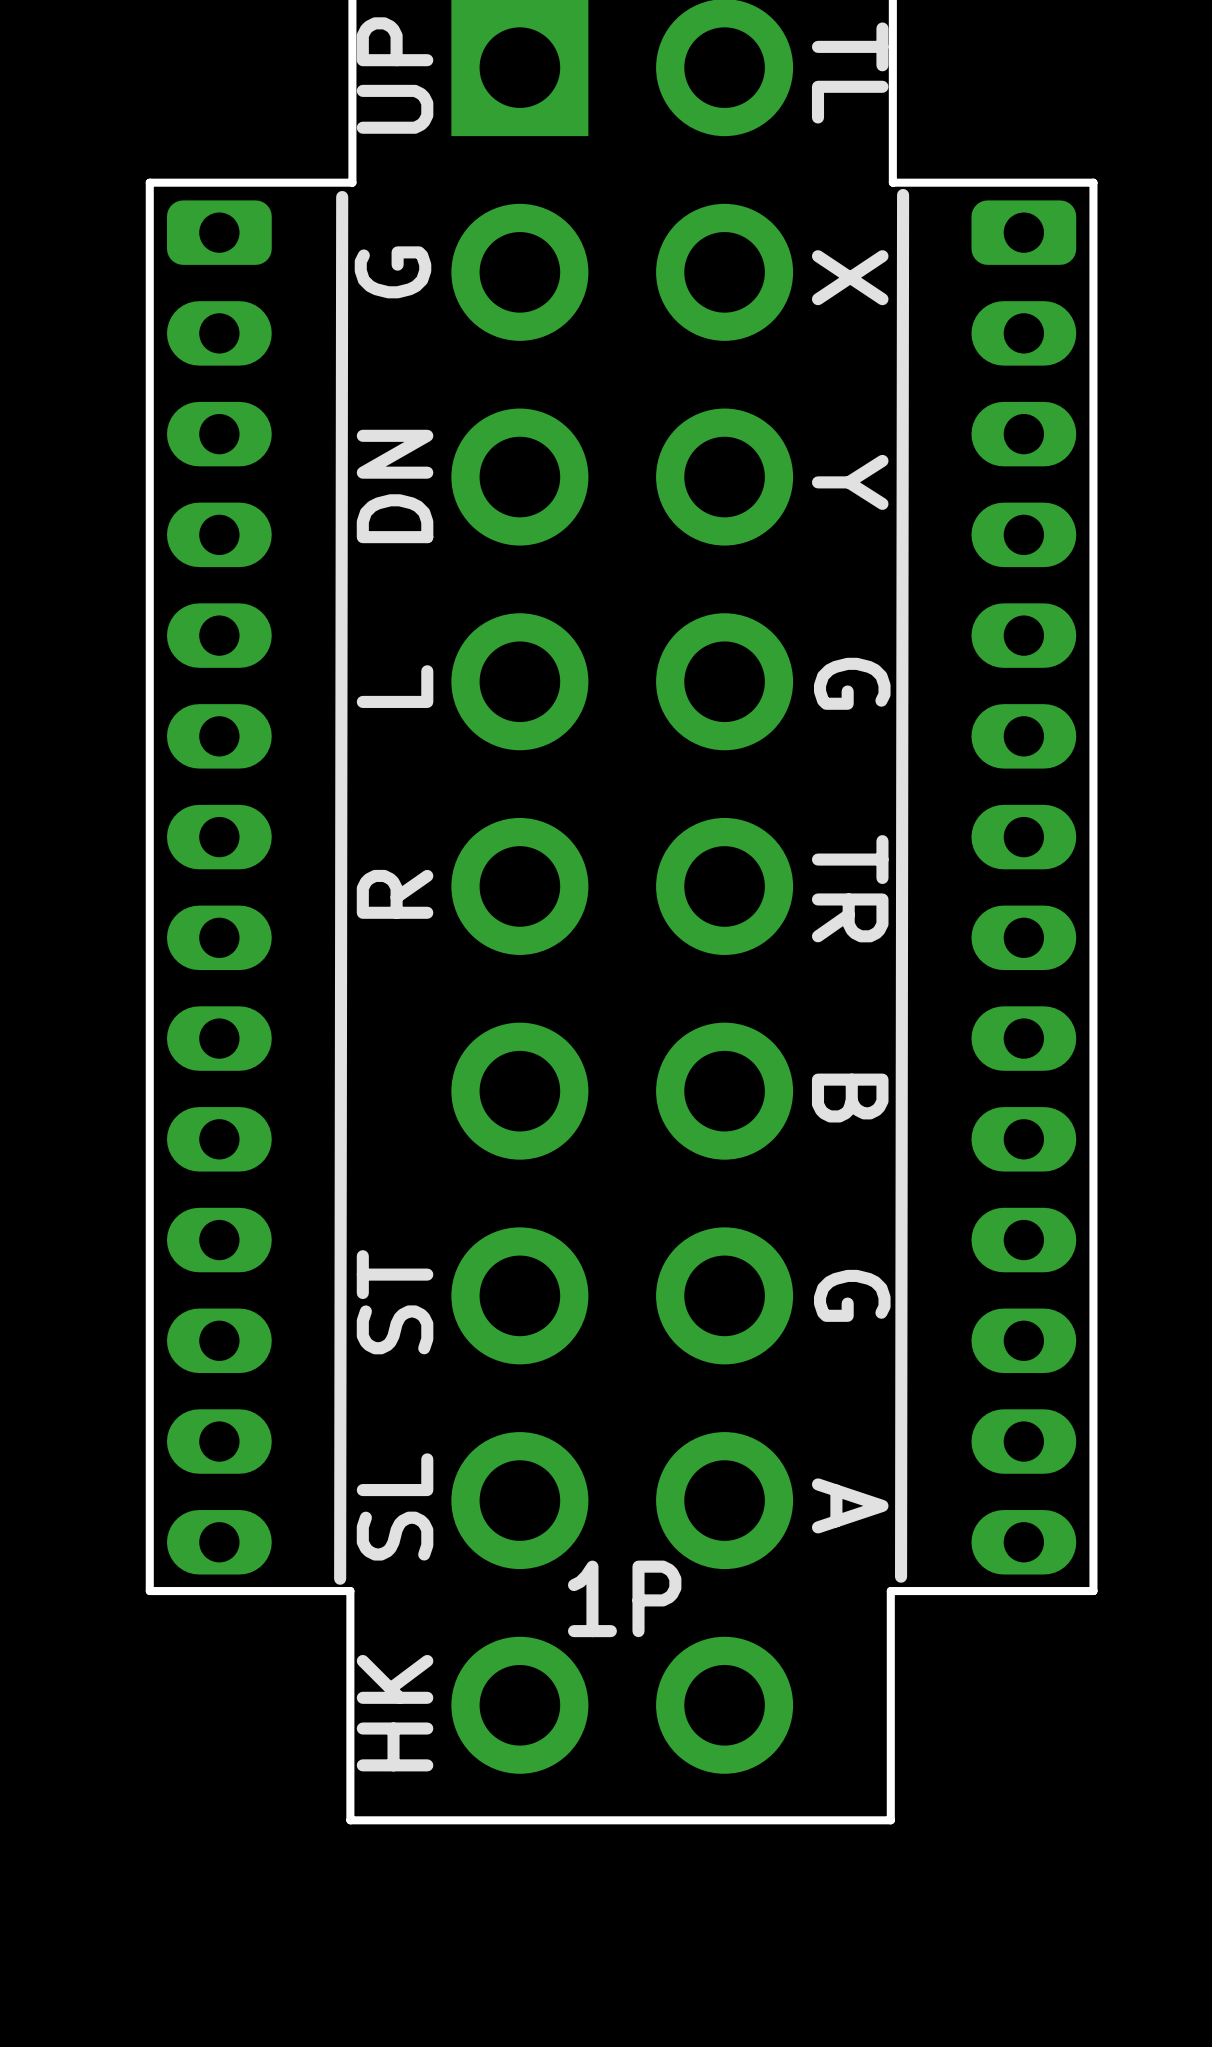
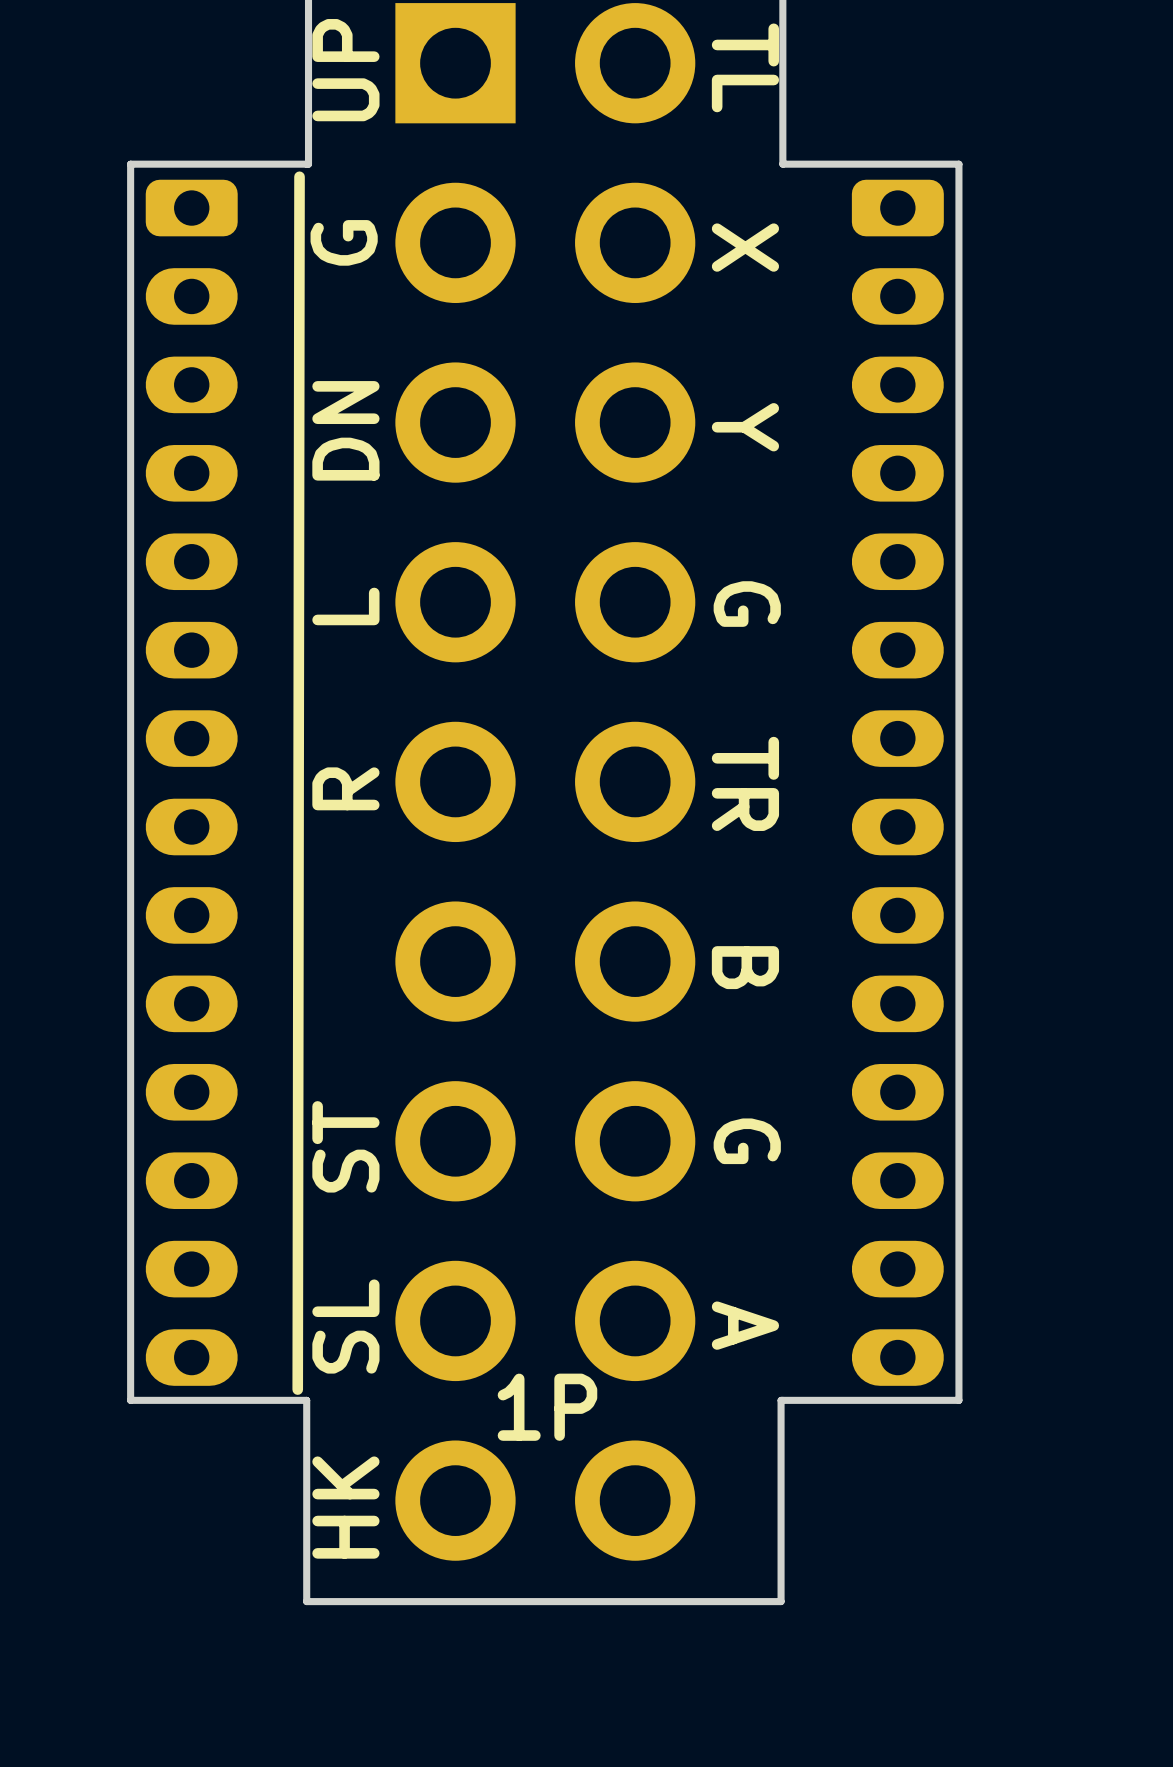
line: (903, 194) (901, 1576) -> none

